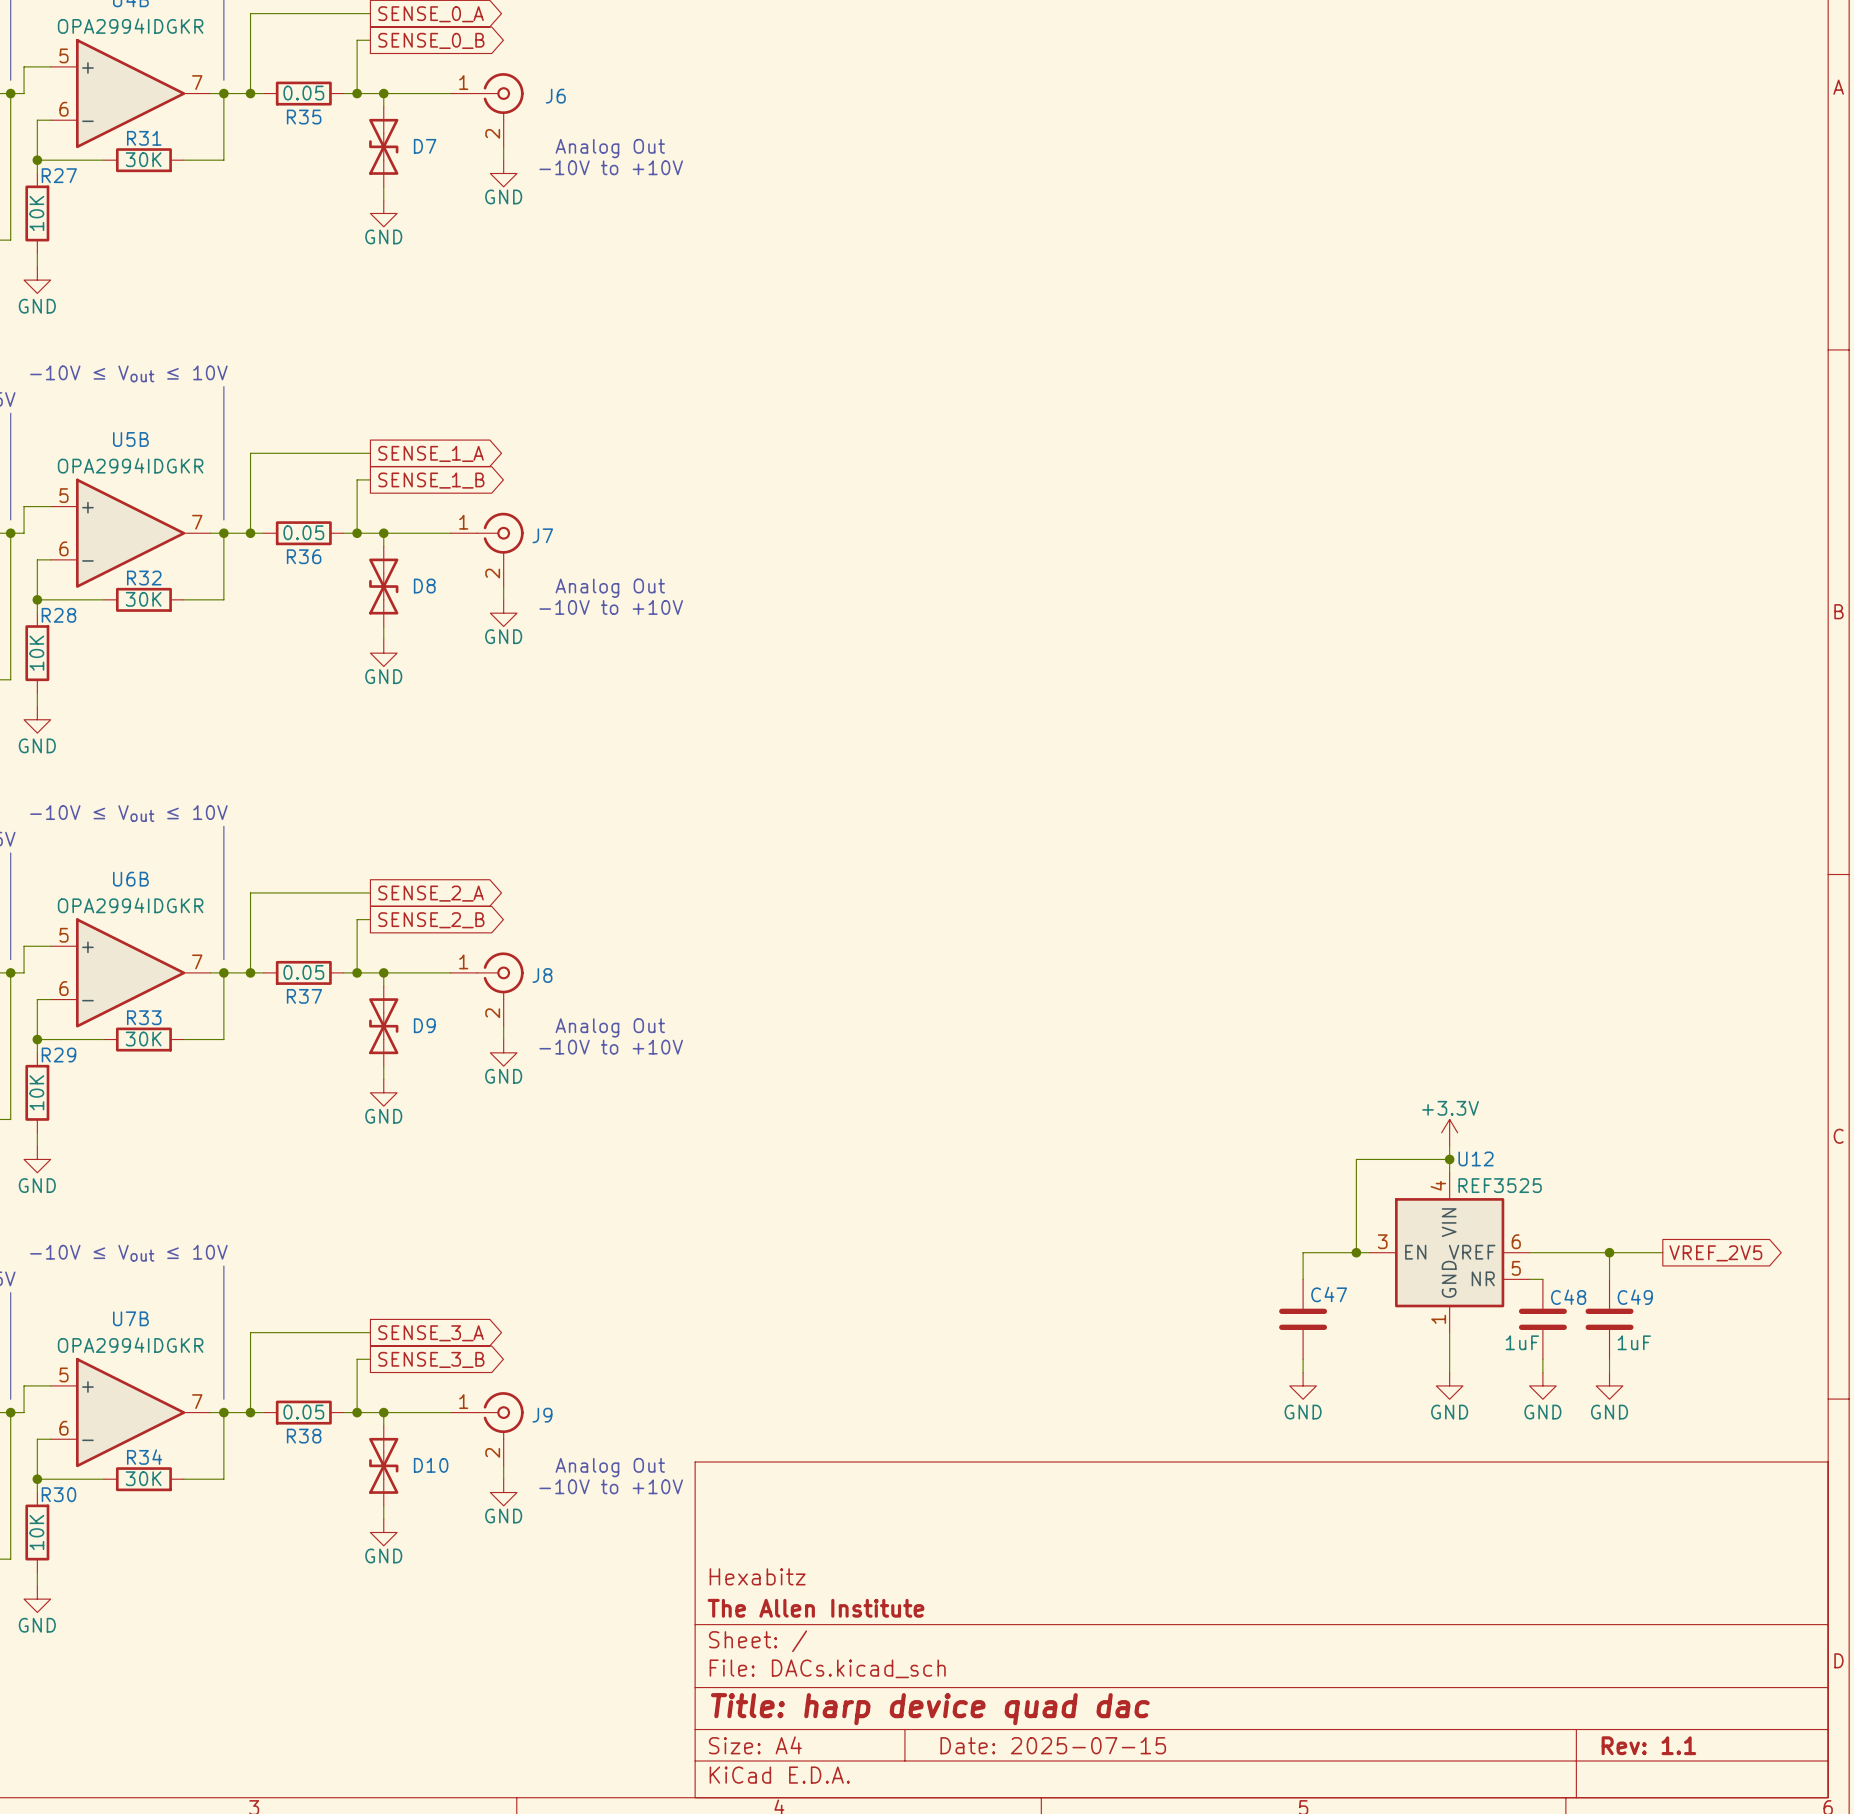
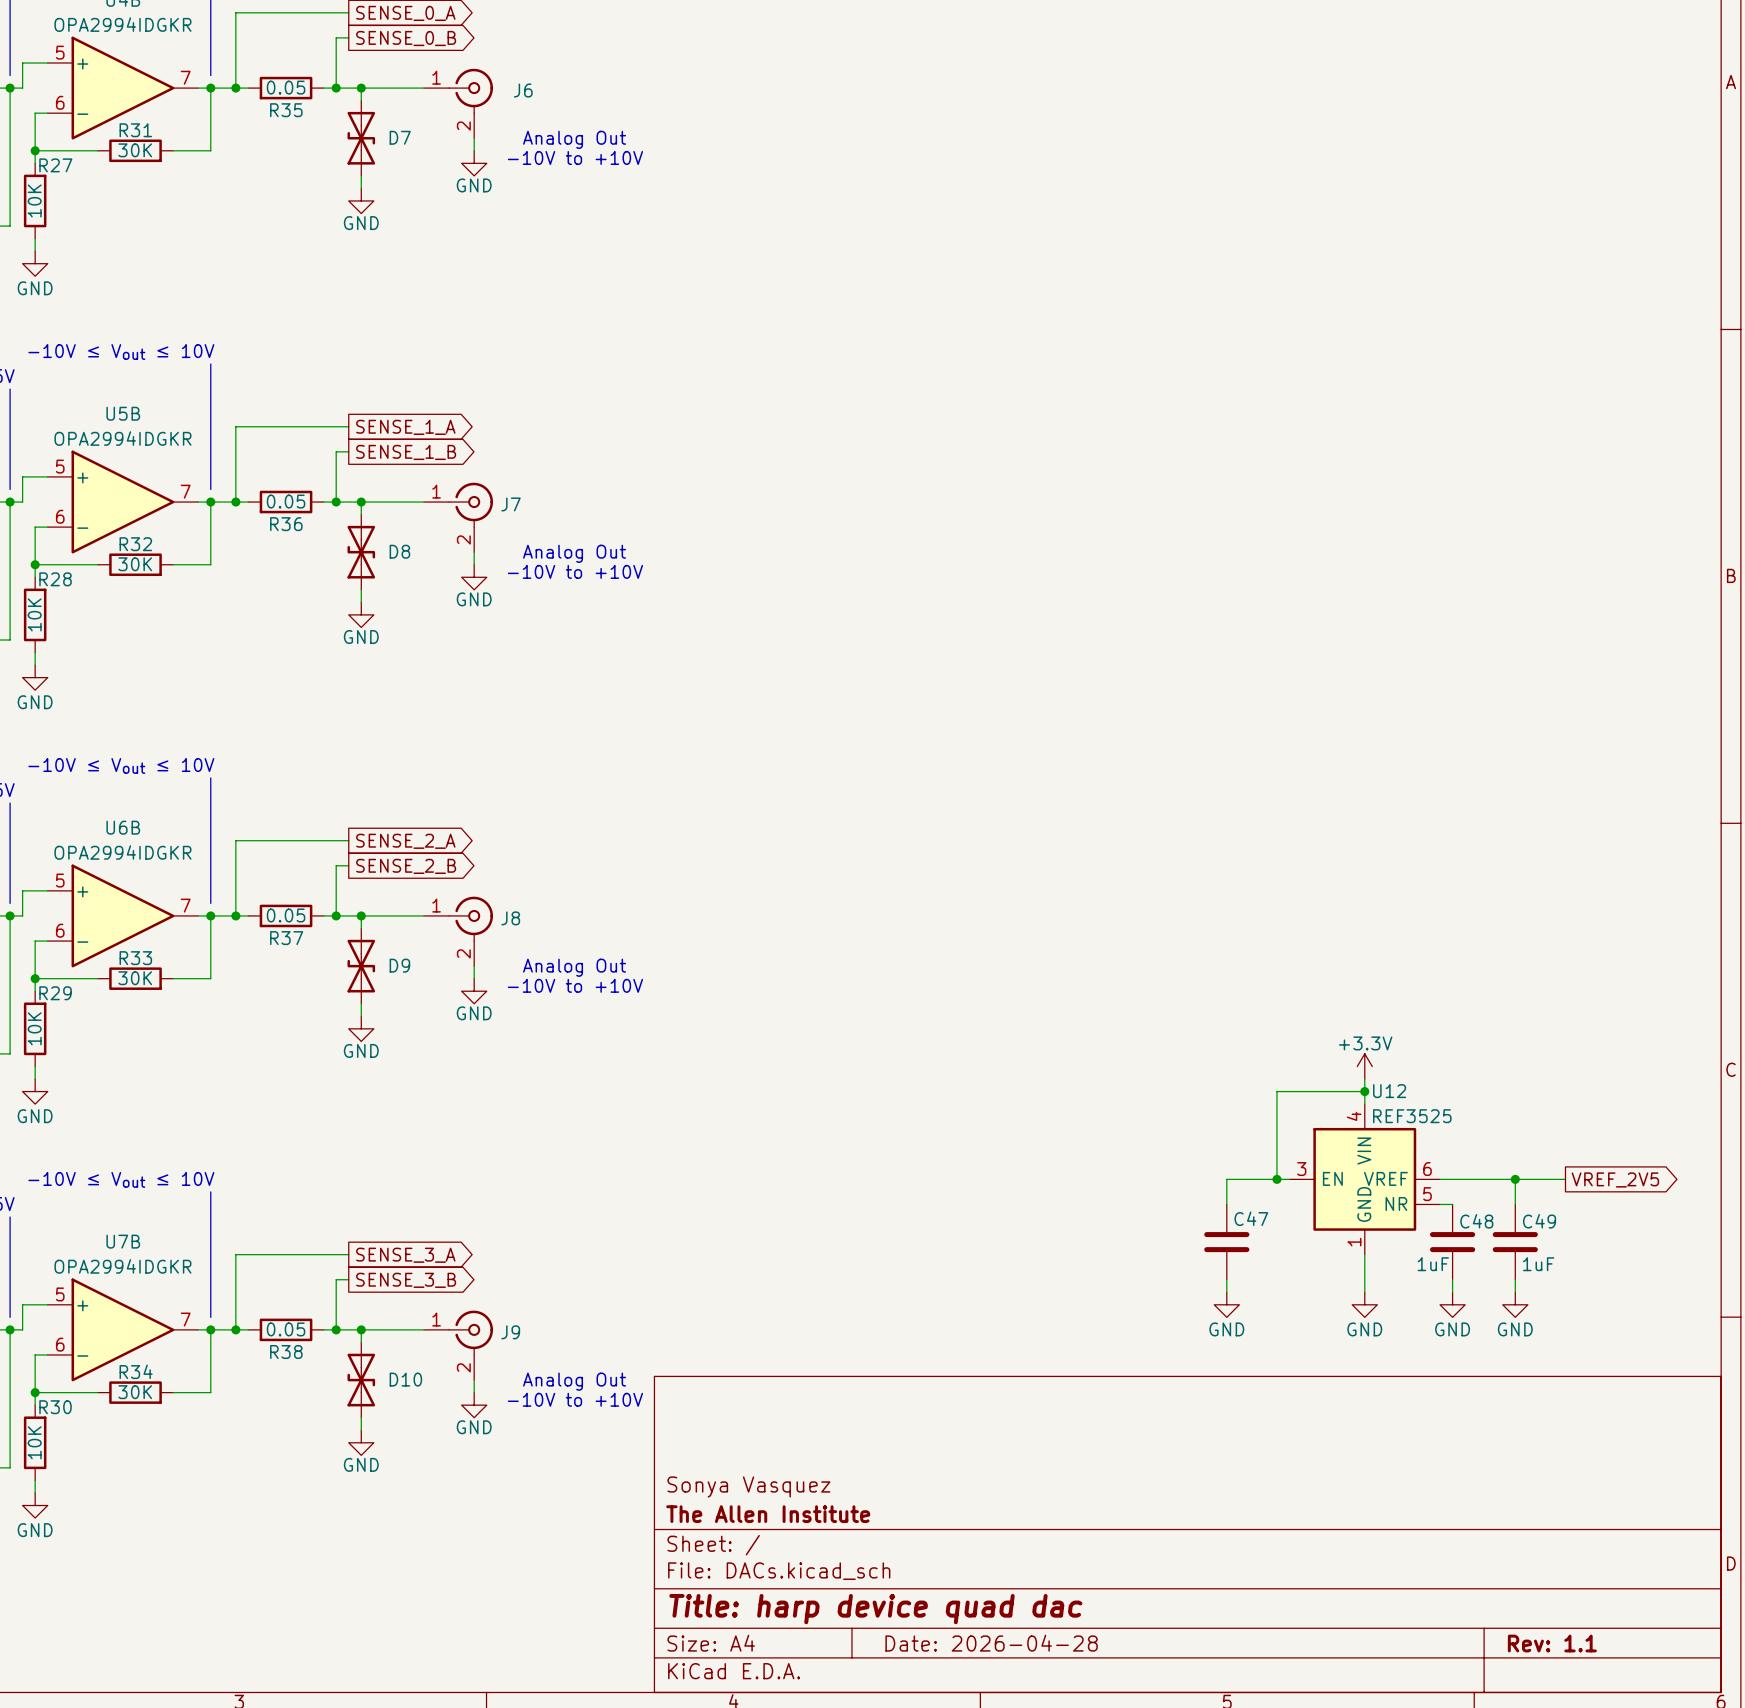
title block: Hexabitz (757, 1576) -> Sonya Vasquez (748, 1486)
title block: Date: 2025-07-15 (1053, 1745) -> Date: 2026-04-28 (991, 1643)

